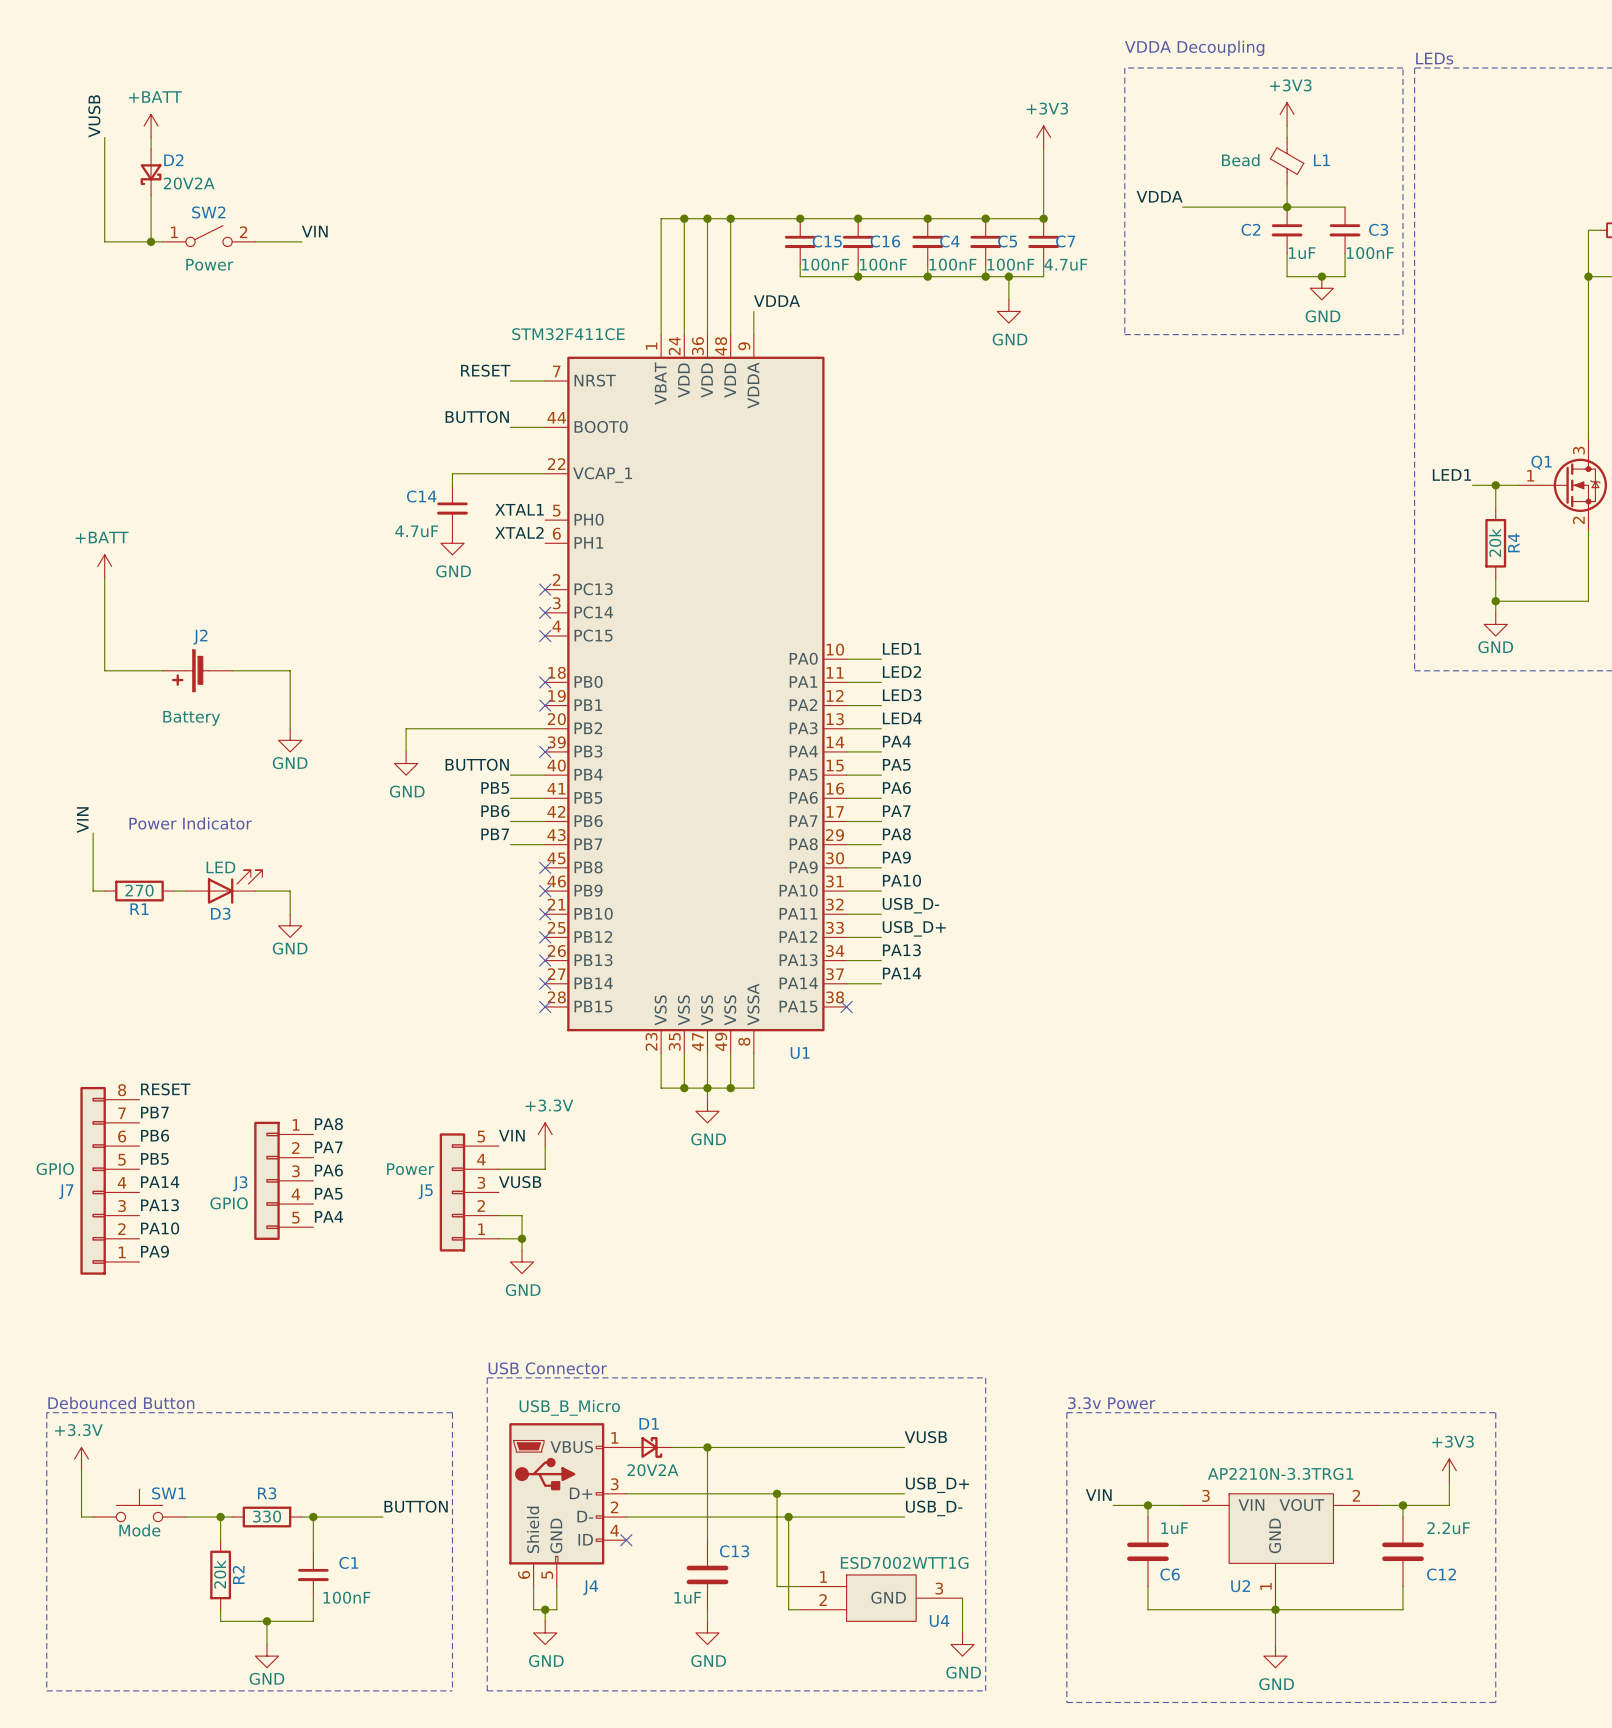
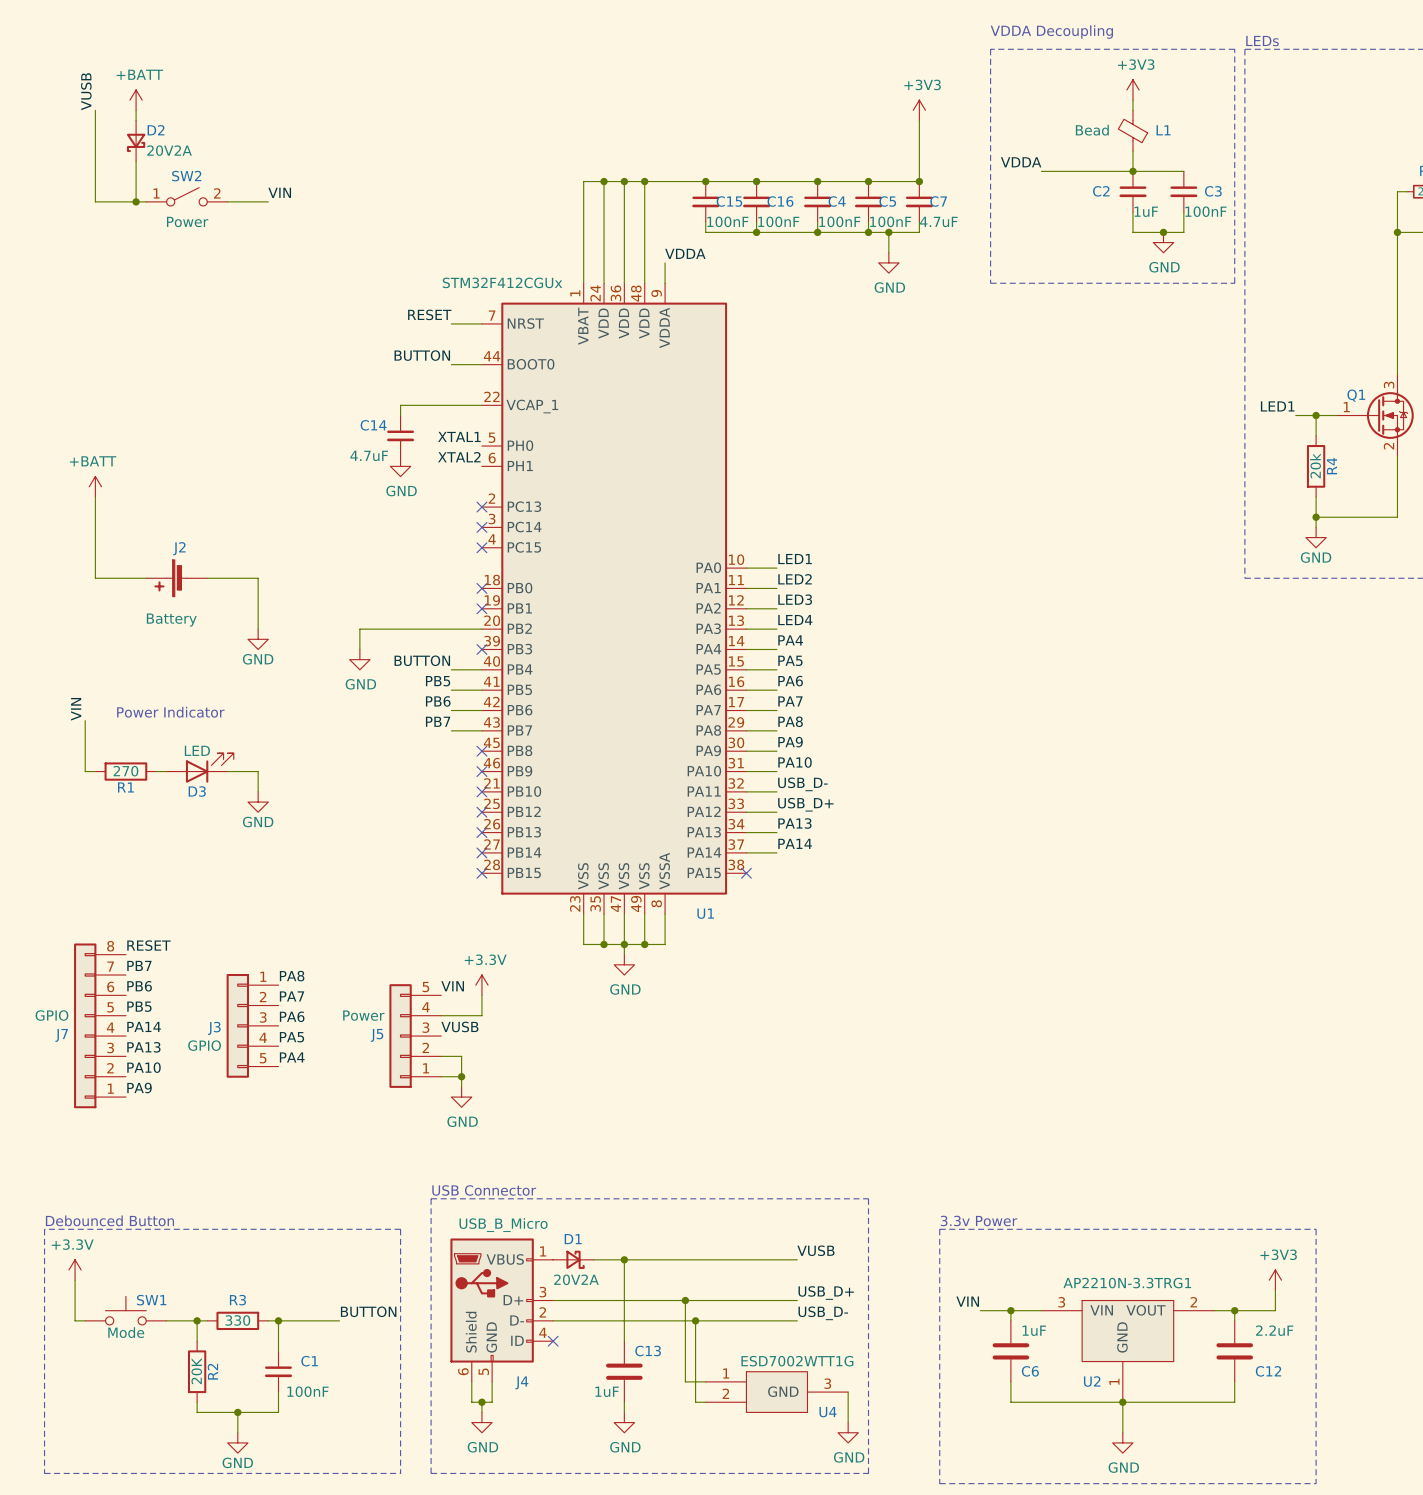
U1 value: STM32F411CE (568, 334) -> STM32F412CGUx (502, 282)
R2 value: 20k (220, 1574) -> 20K (196, 1371)

